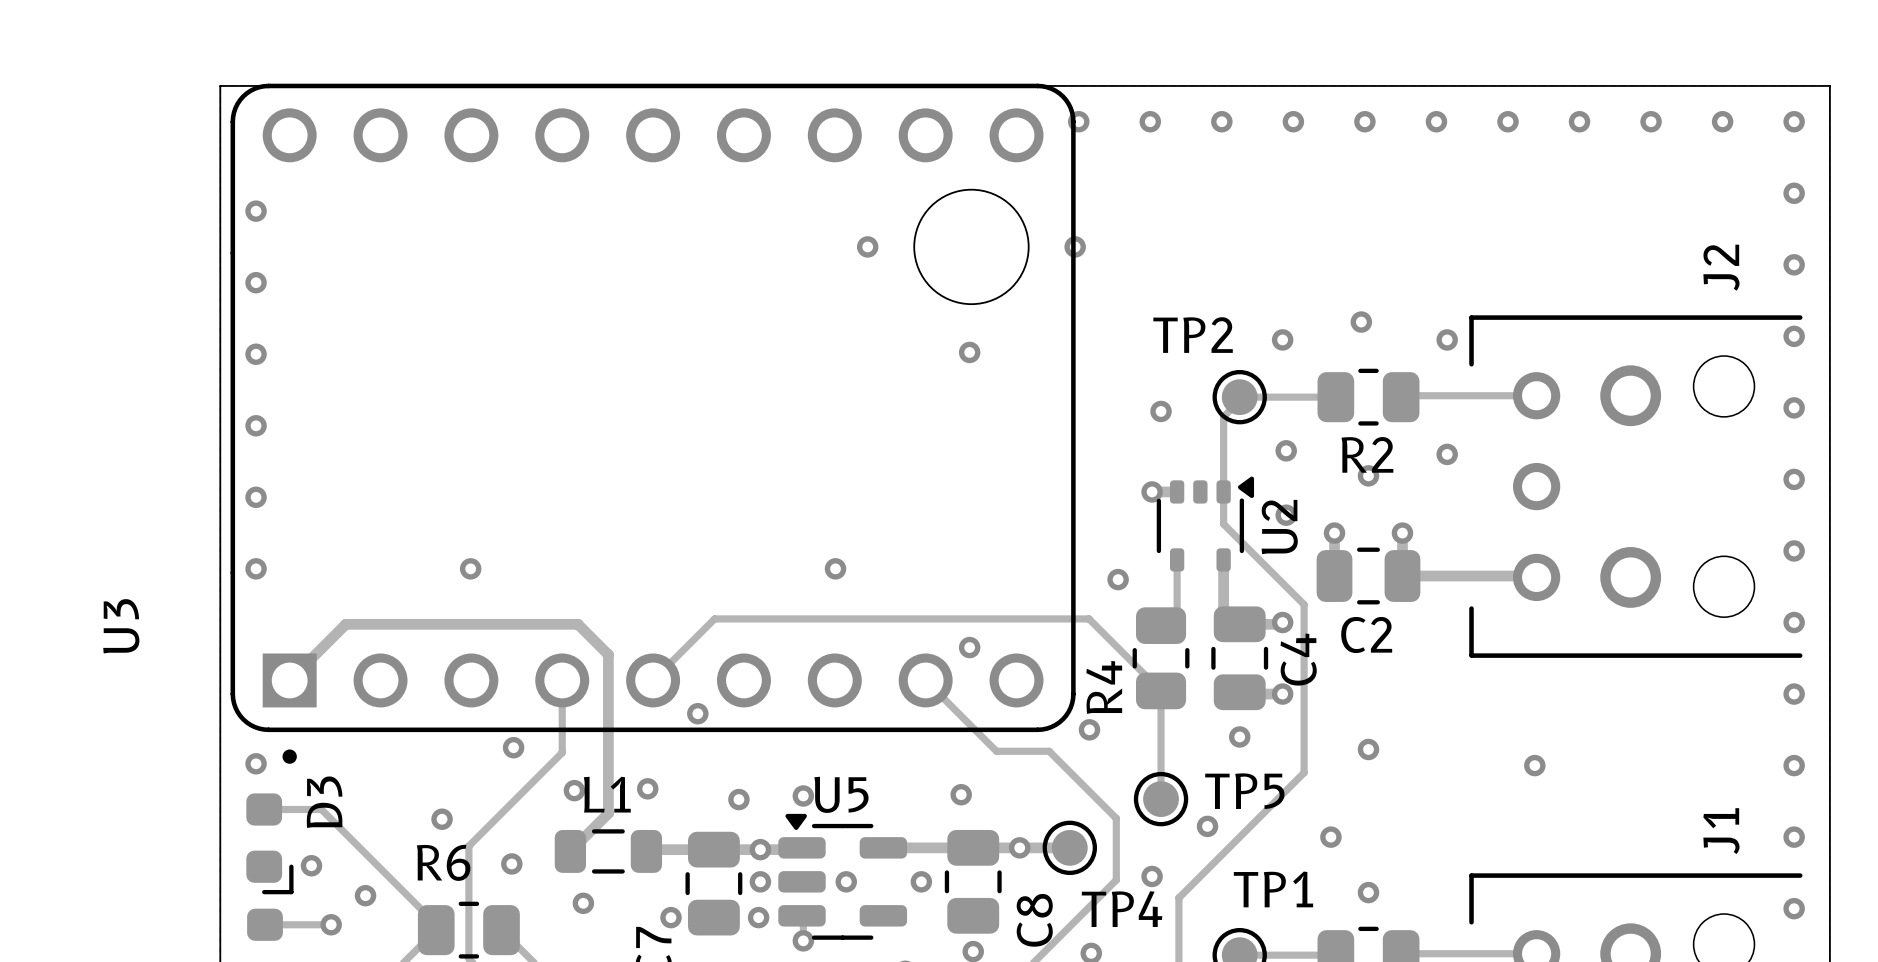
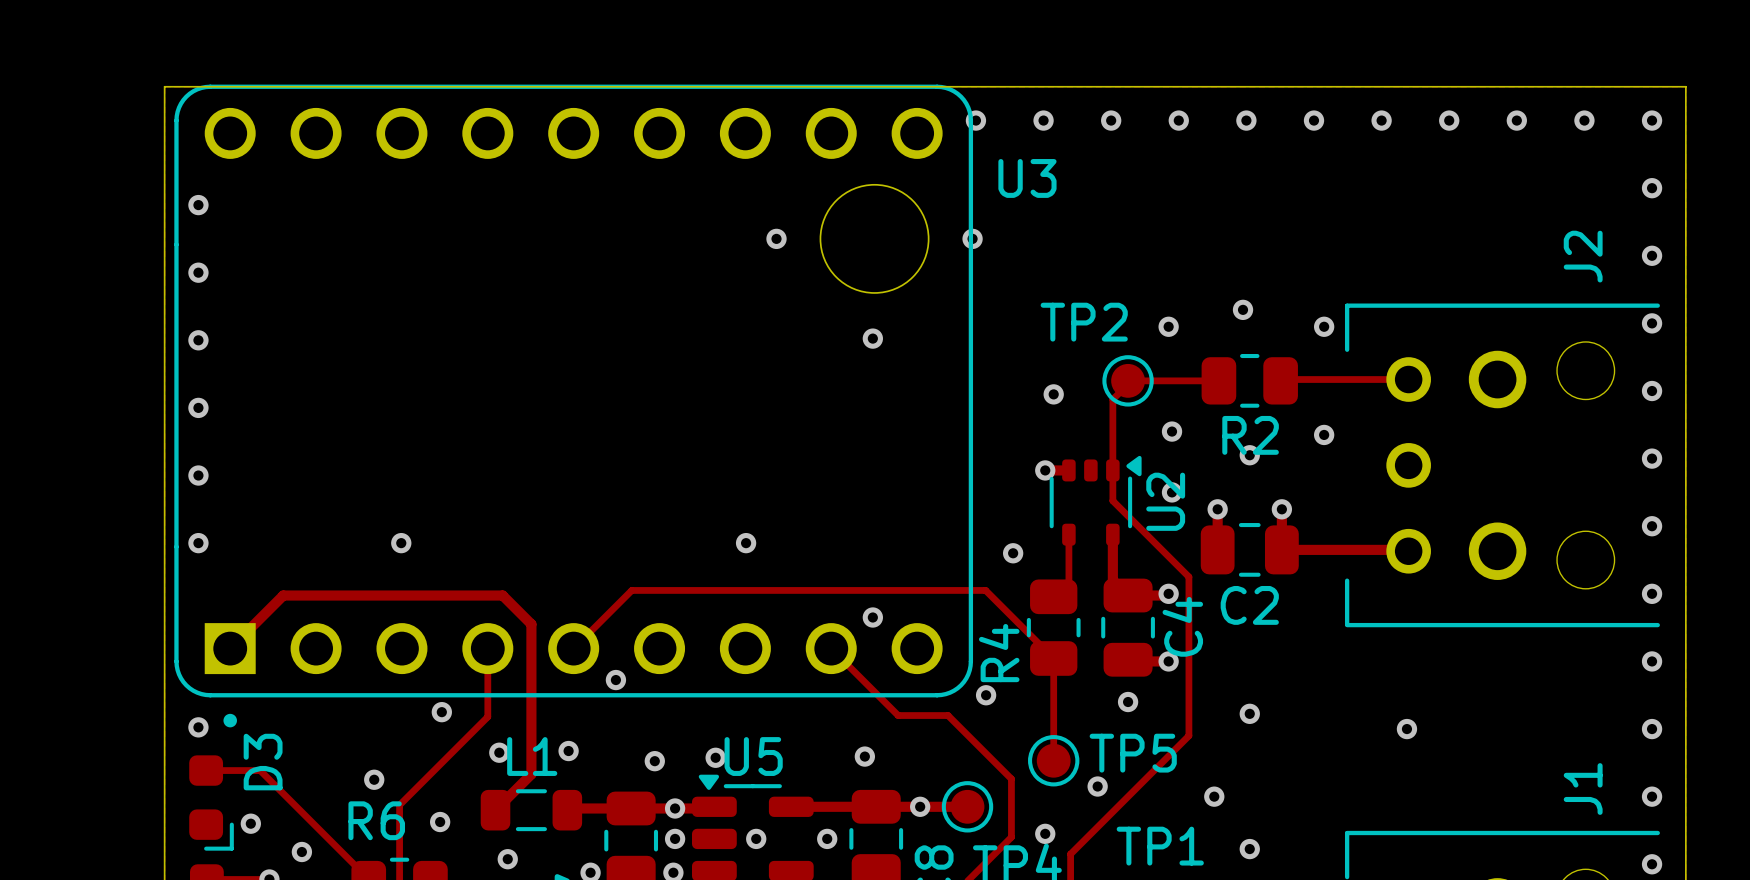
U3 name rotation: 0° (121, 626) -> 90° clockwise (1027, 178)
U3 name position: U3 (121, 626) -> U3 (1027, 178)

